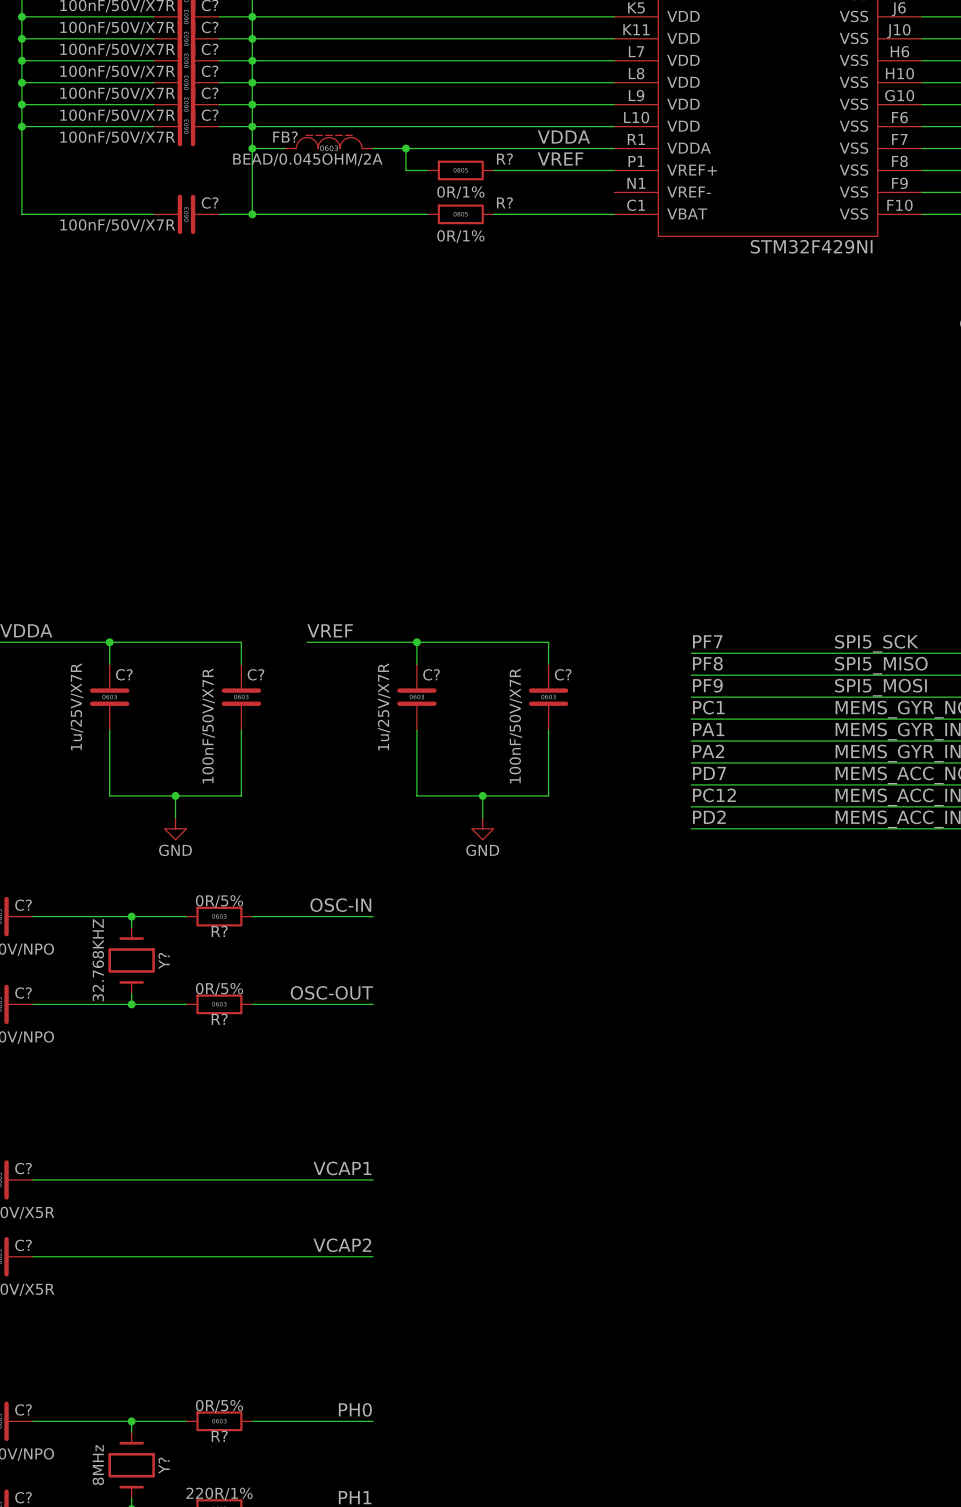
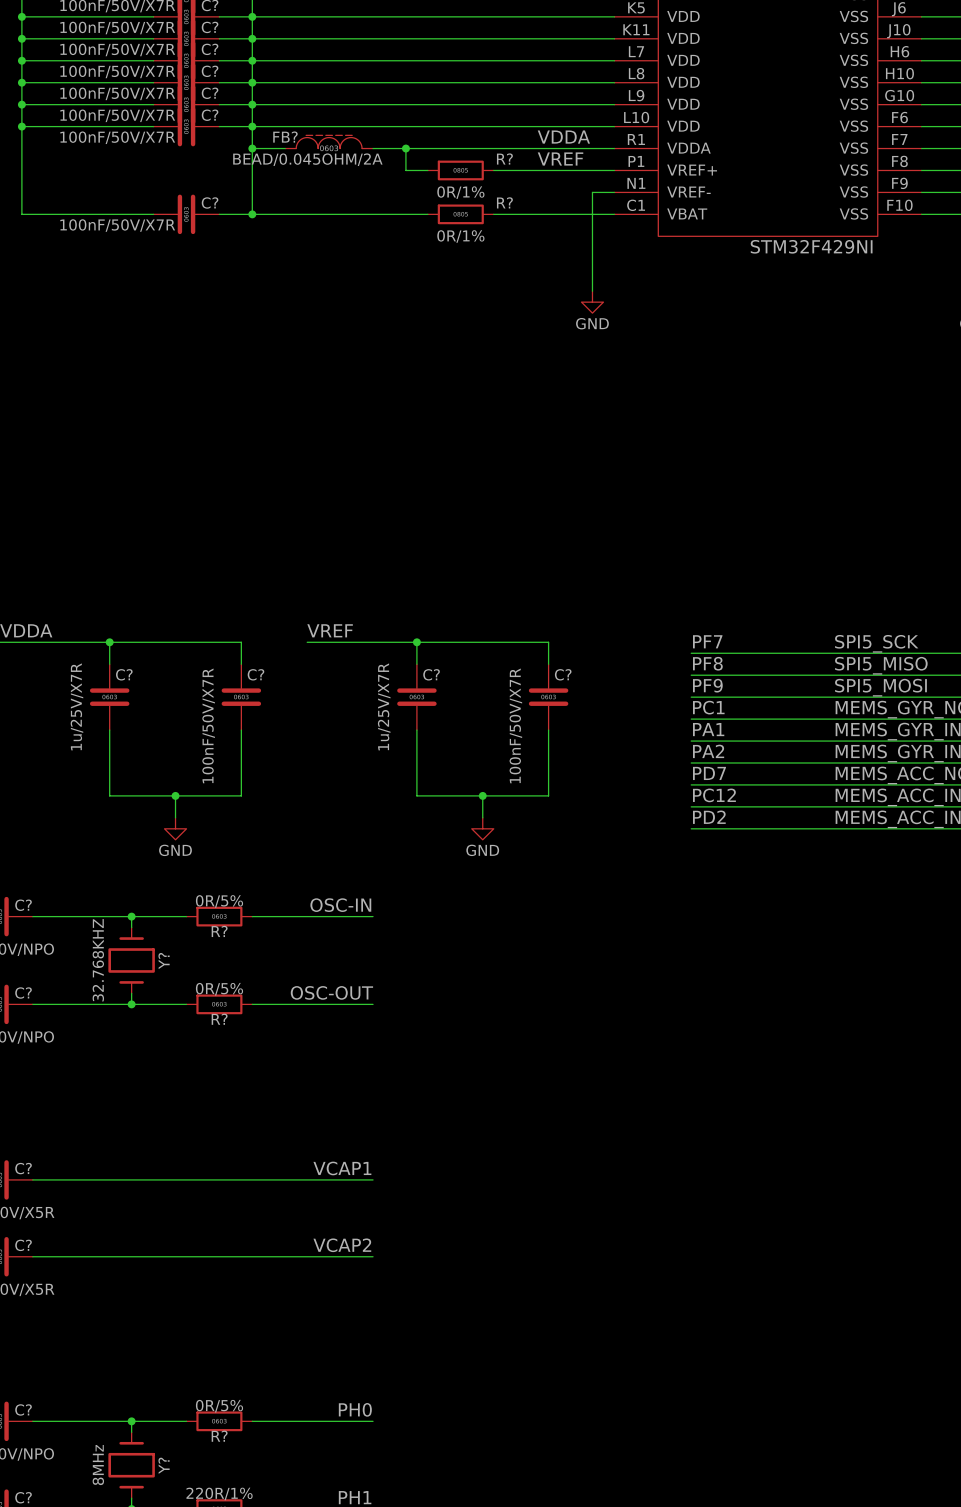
wire: none -> (614, 192) (592, 192) (592, 291)
power symbol: none -> GND (592, 302)

